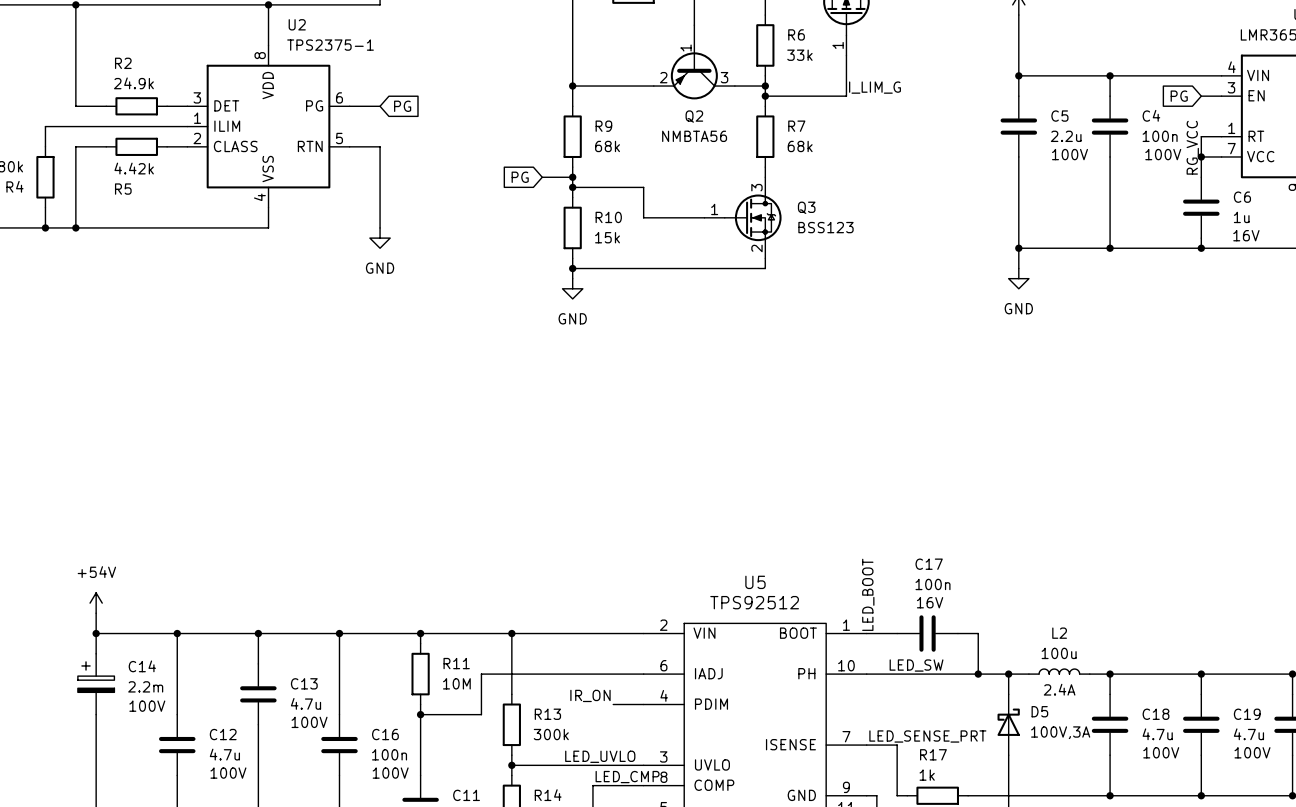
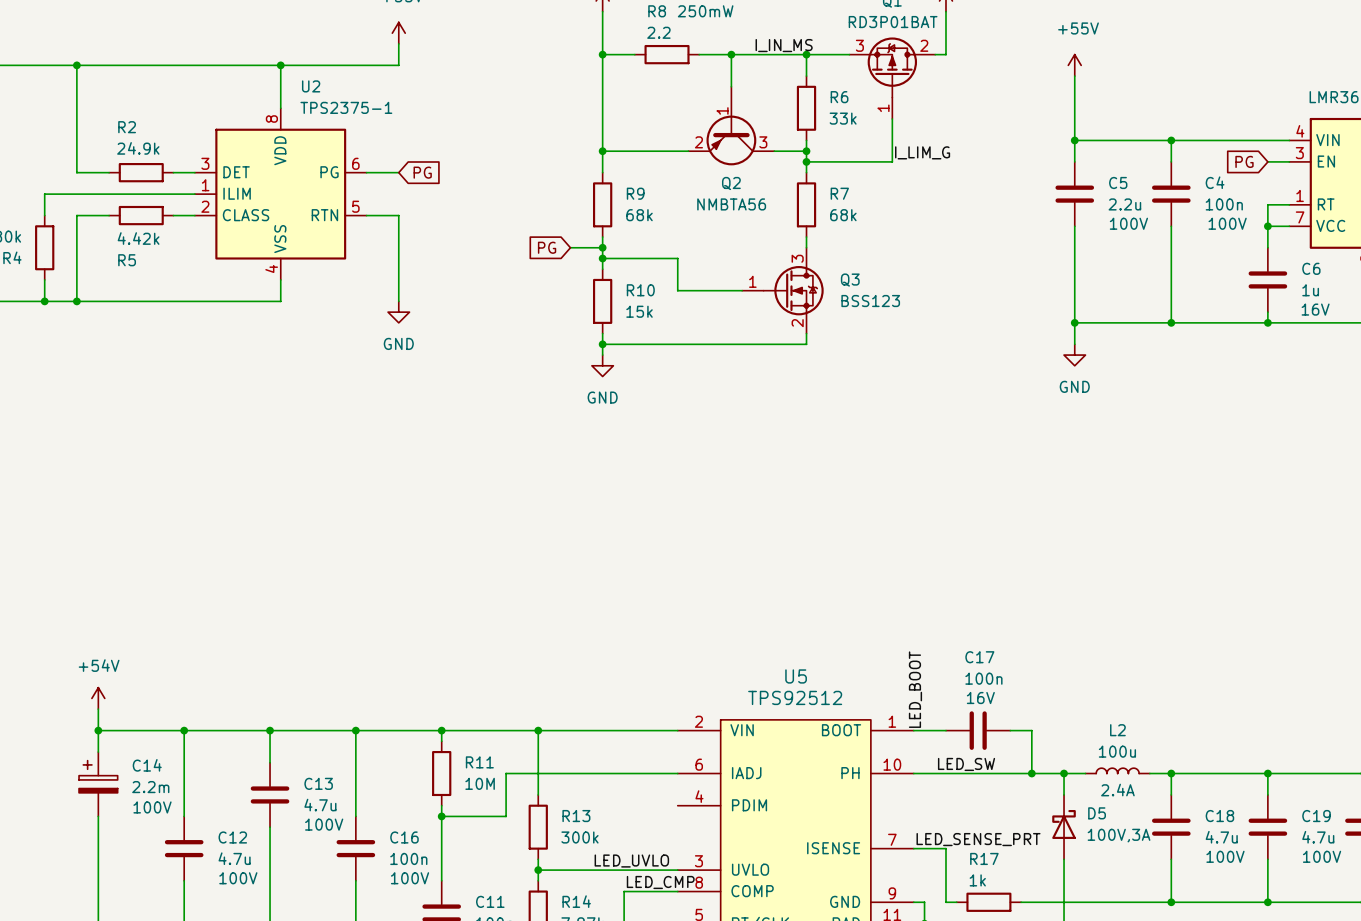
label: RG_VCC (1192, 147) -> none
label: IR_ON (590, 695) -> none
wire: (613, 704) (643, 704) -> none

